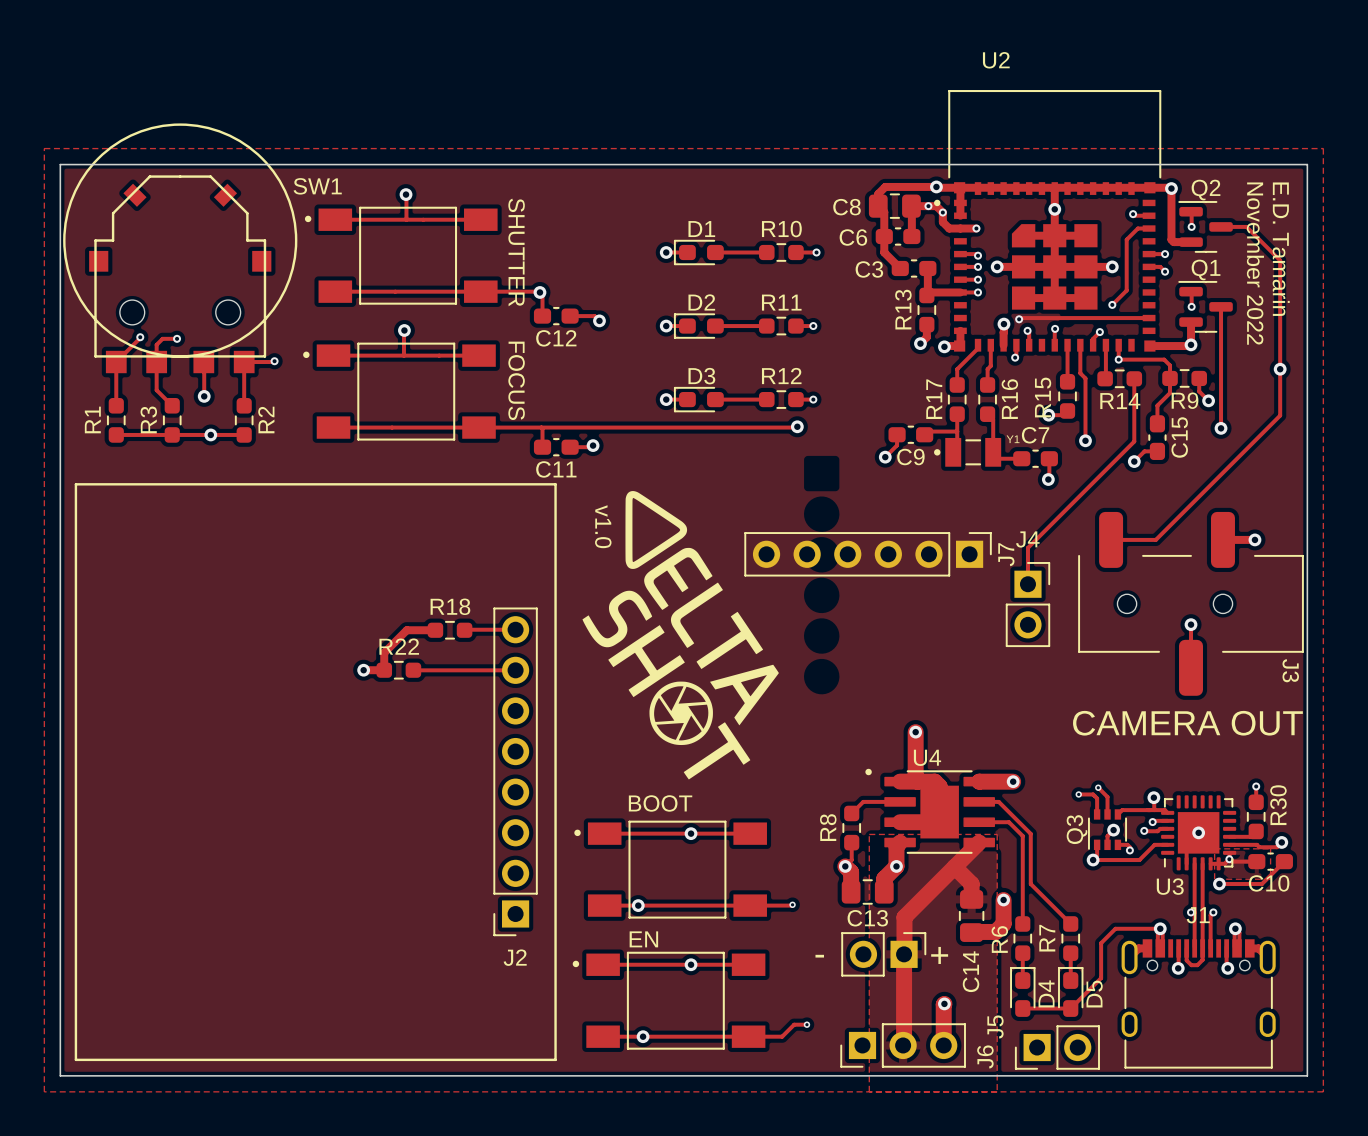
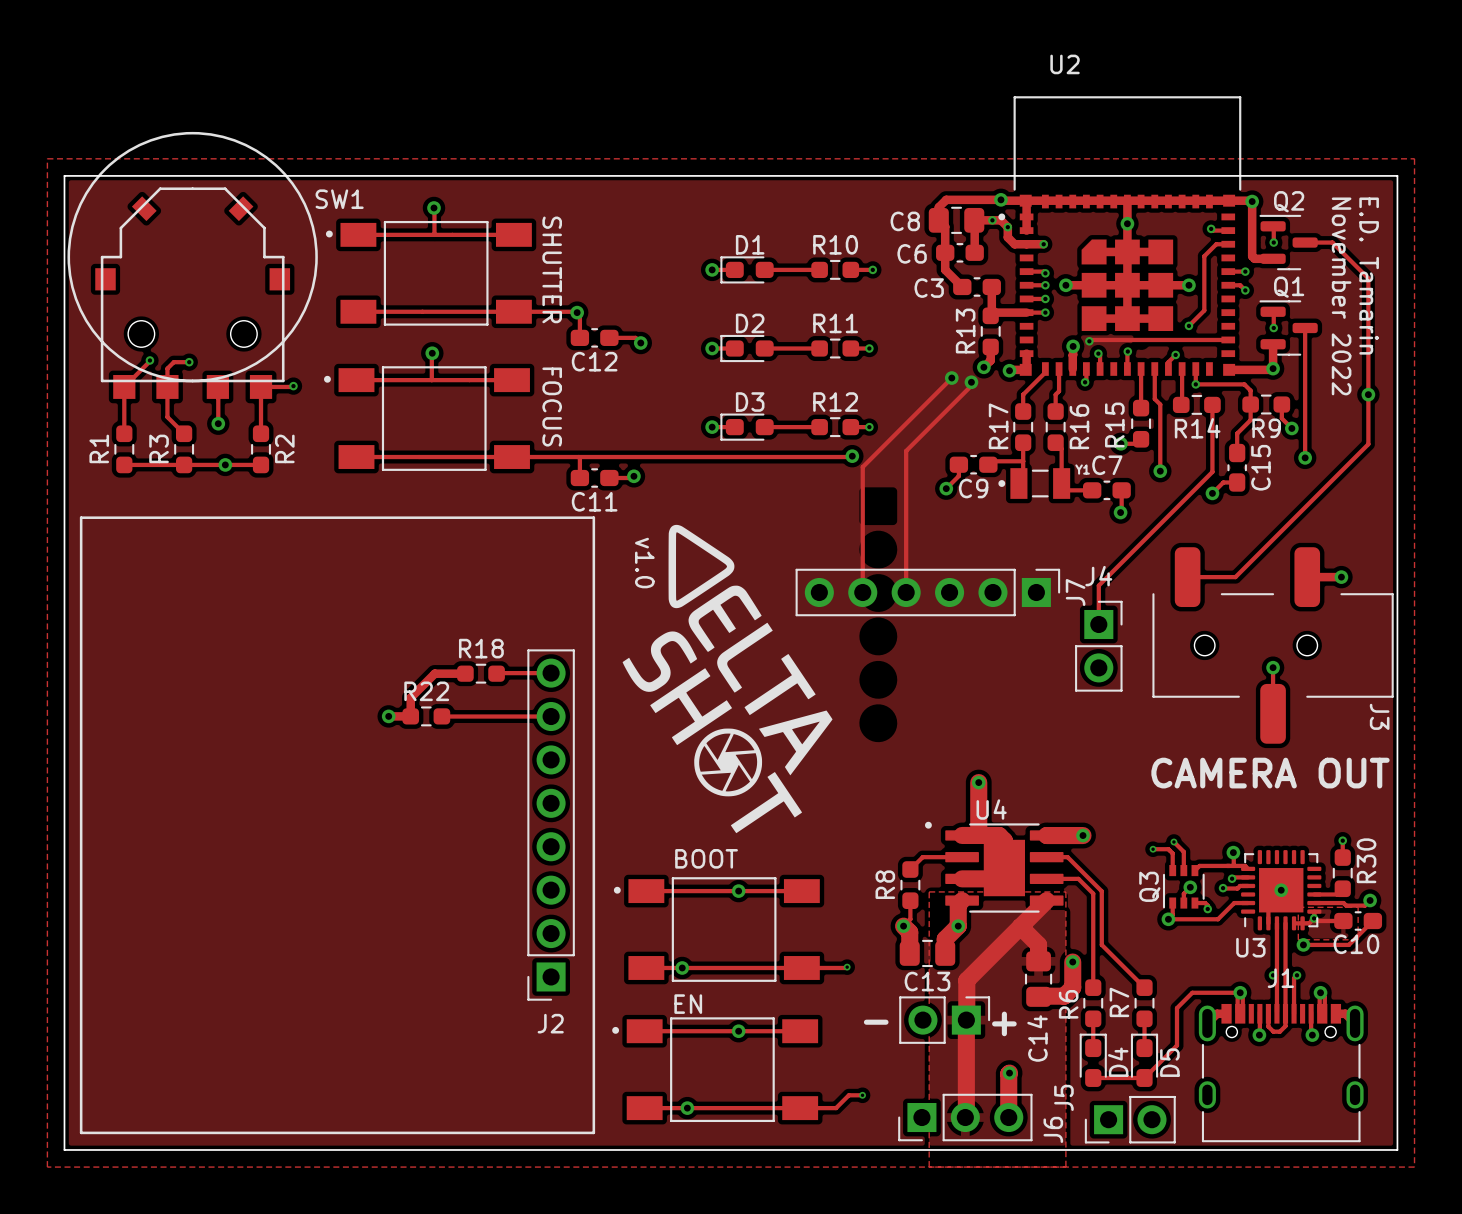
track: none -> (951, 378) (862, 467) (862, 592)
via: none -> (951, 378)
track: none -> (971, 382) (971, 385) (906, 451) (906, 592)
via: none -> (971, 382)

